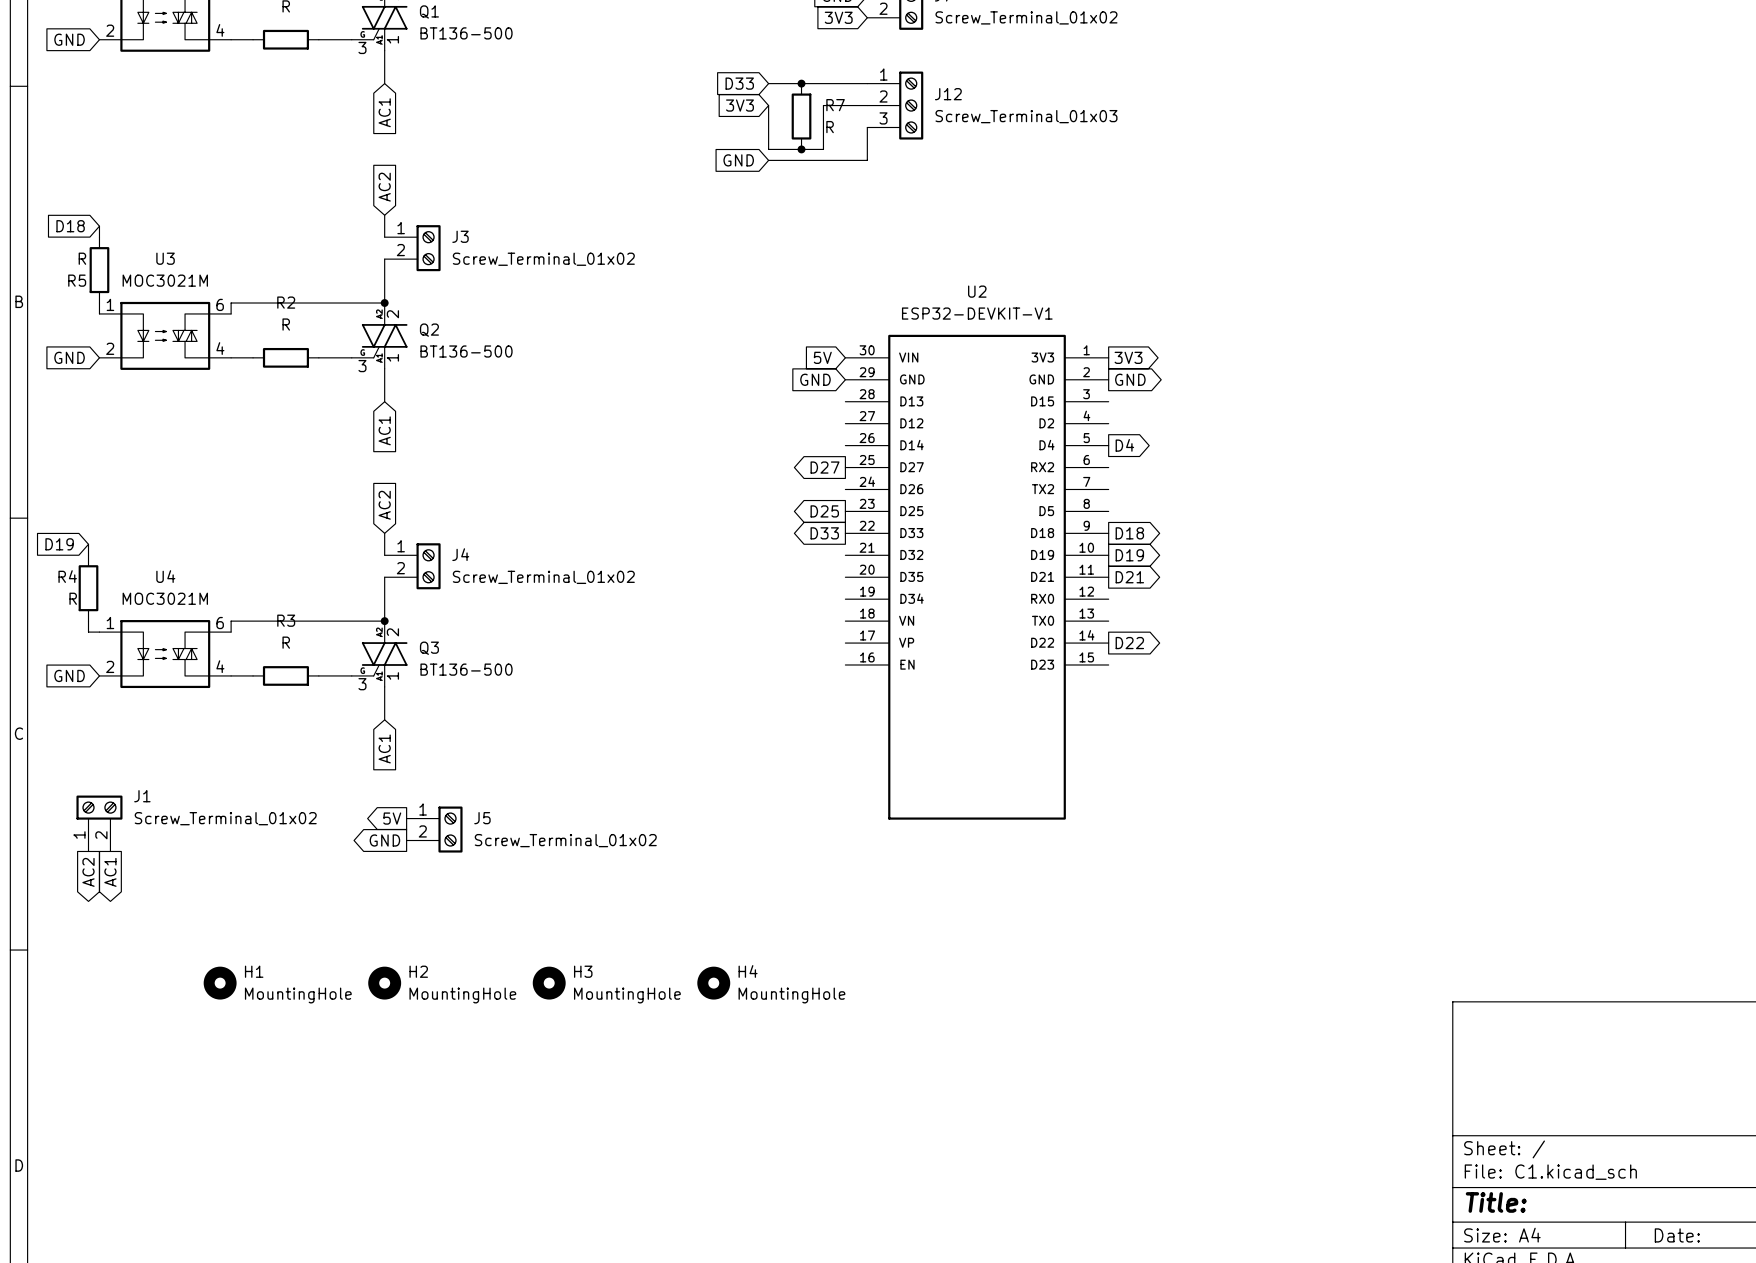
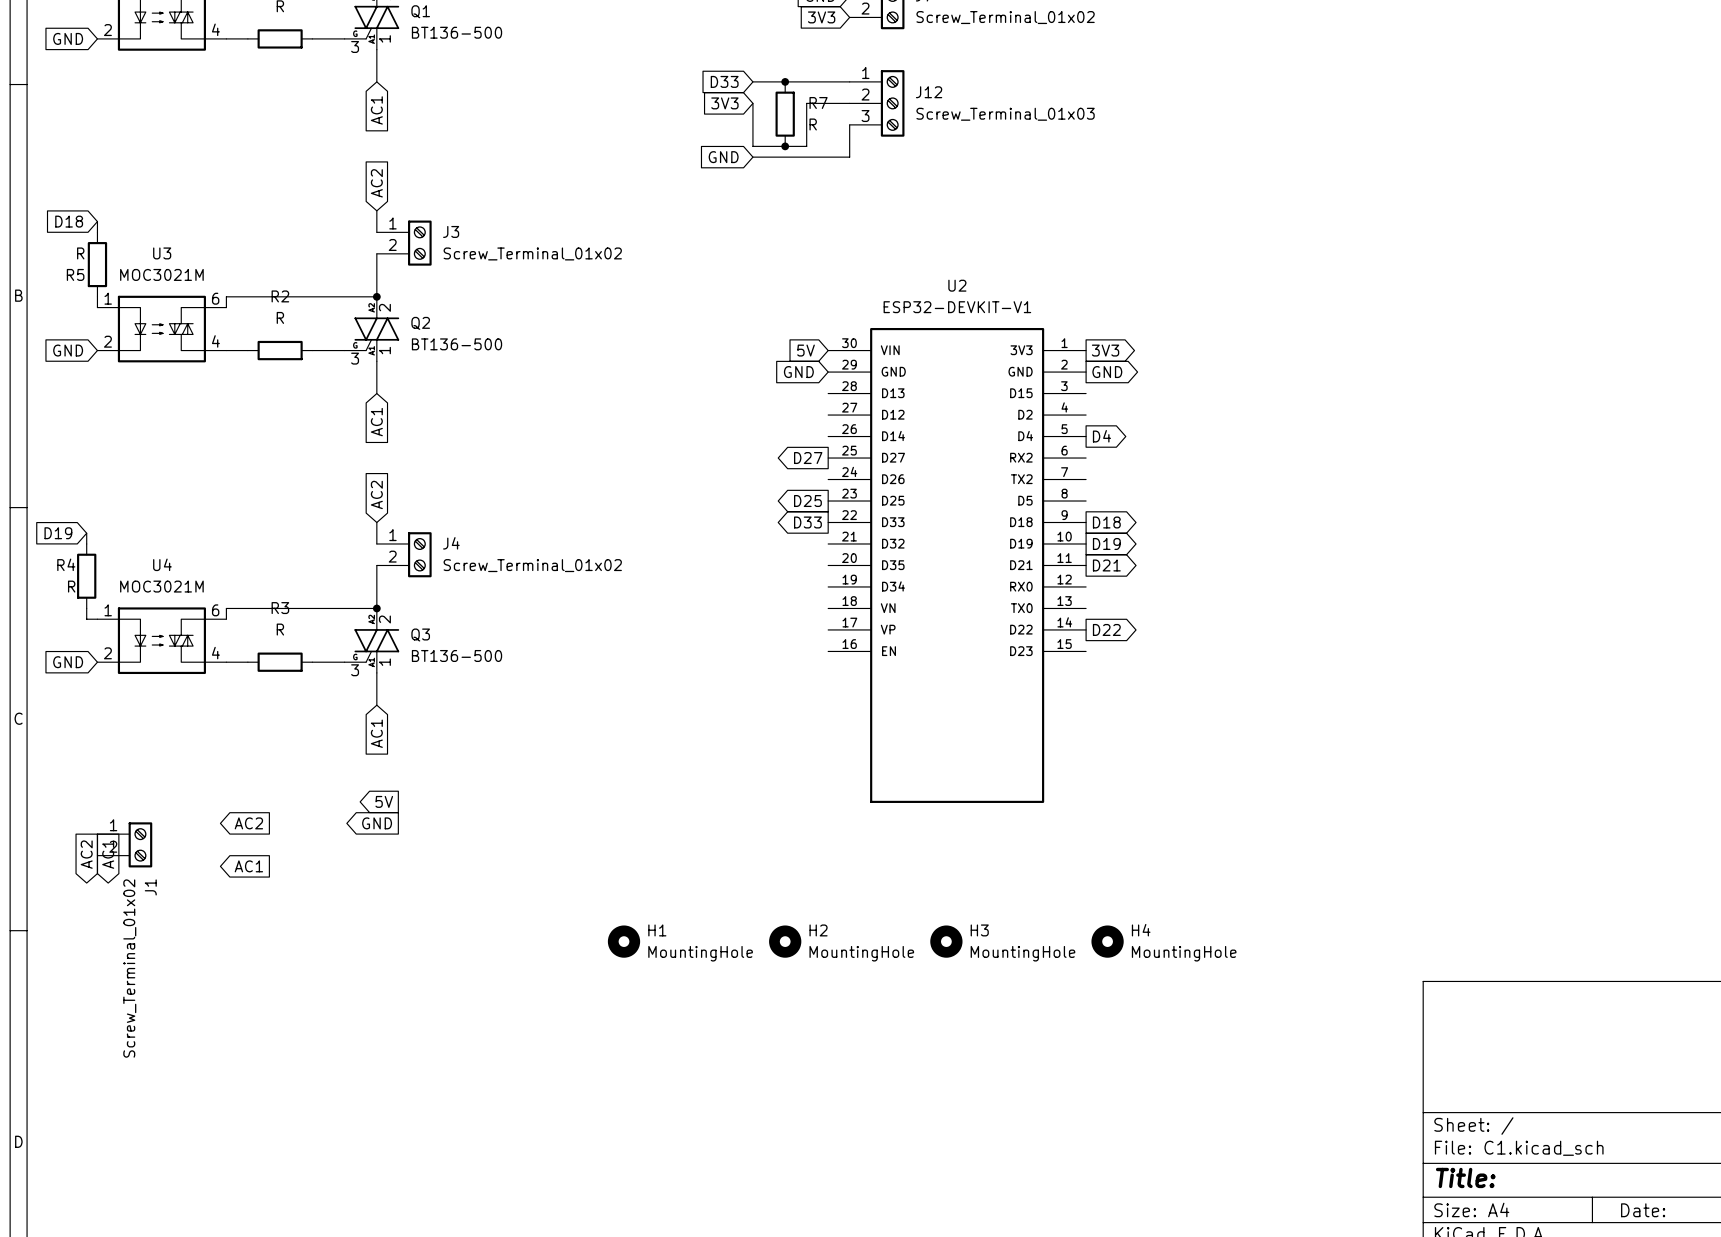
J1 rotation: 0° (99, 807) -> 90° clockwise (140, 844)
J1 position: (99, 823) -> (124, 844)
J5: Screw_Terminal_01x02 (434, 829) -> none
global label: none -> AC2 (248, 823)
global label: none -> AC1 (248, 866)
H1 position: (220, 983) -> (624, 941)
H2 position: (384, 983) -> (785, 941)
H3 position: (549, 983) -> (946, 941)
H4 position: (713, 983) -> (1107, 941)

